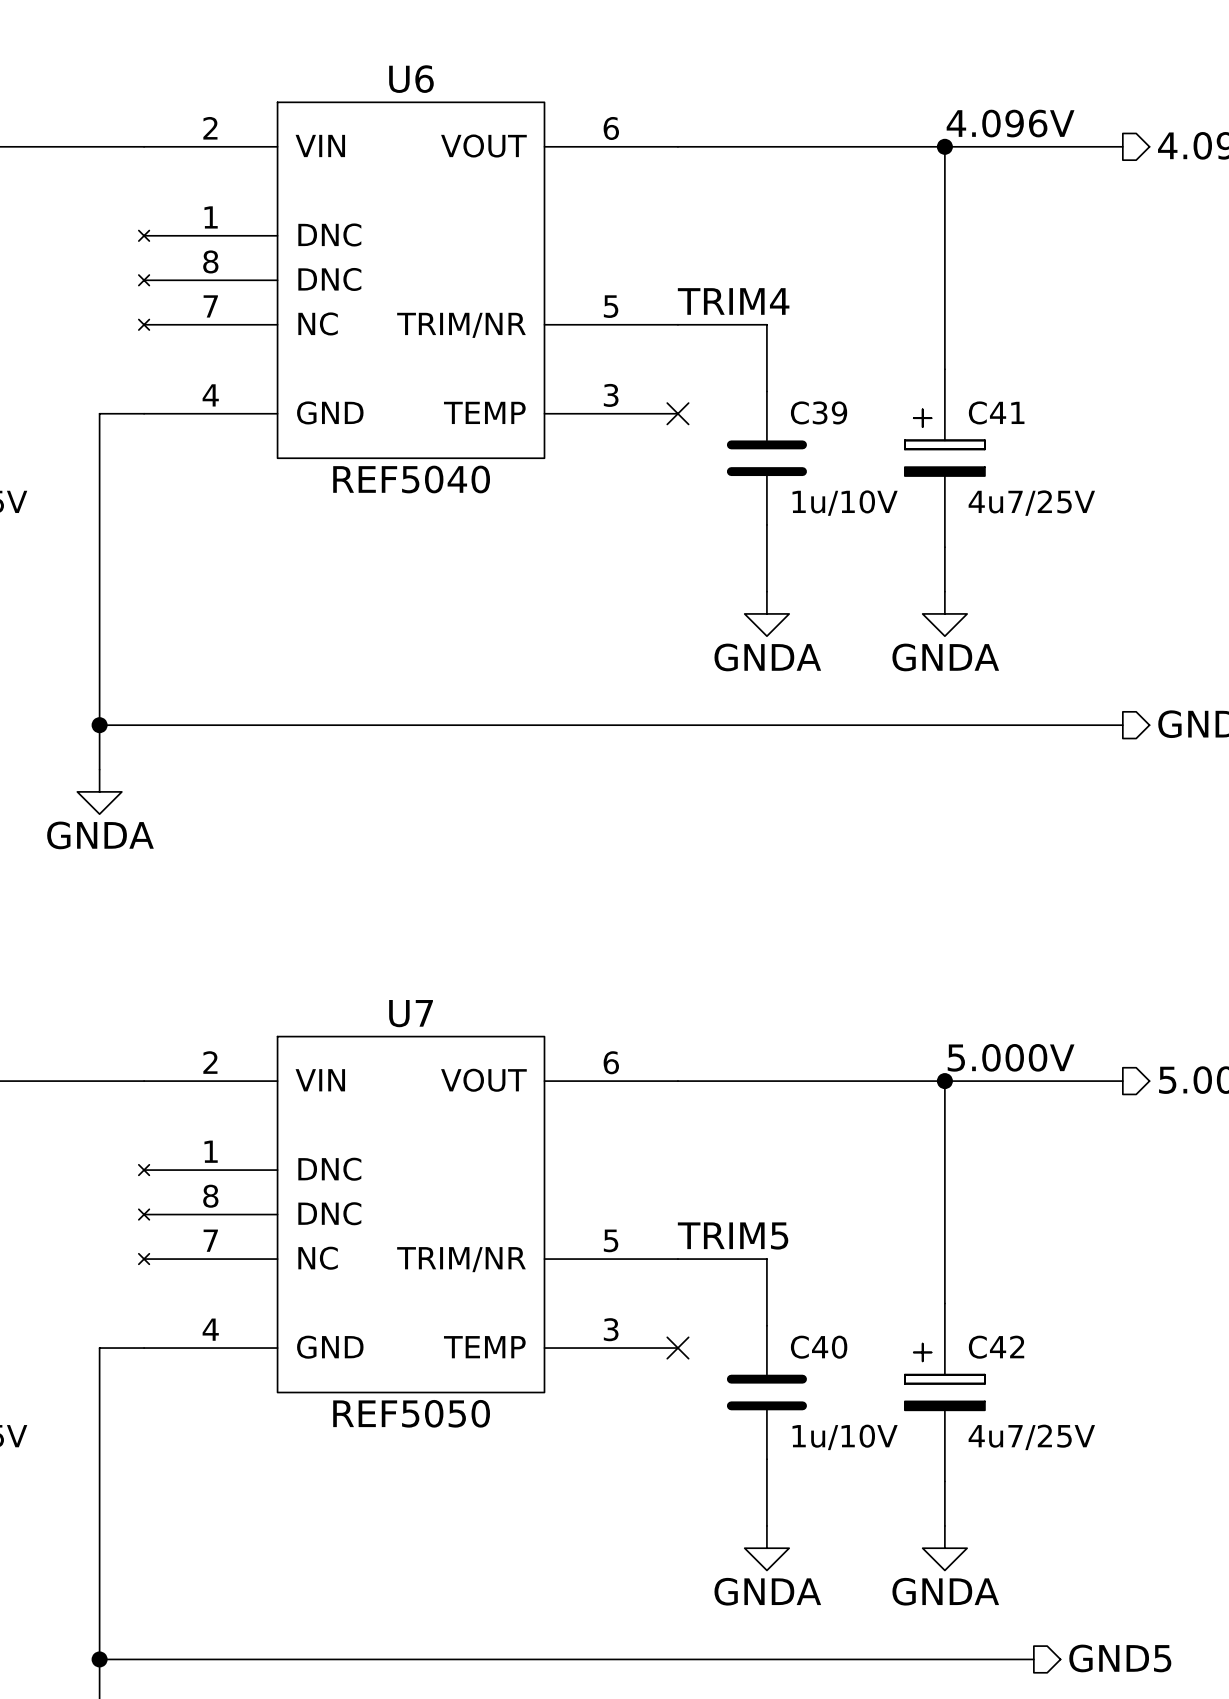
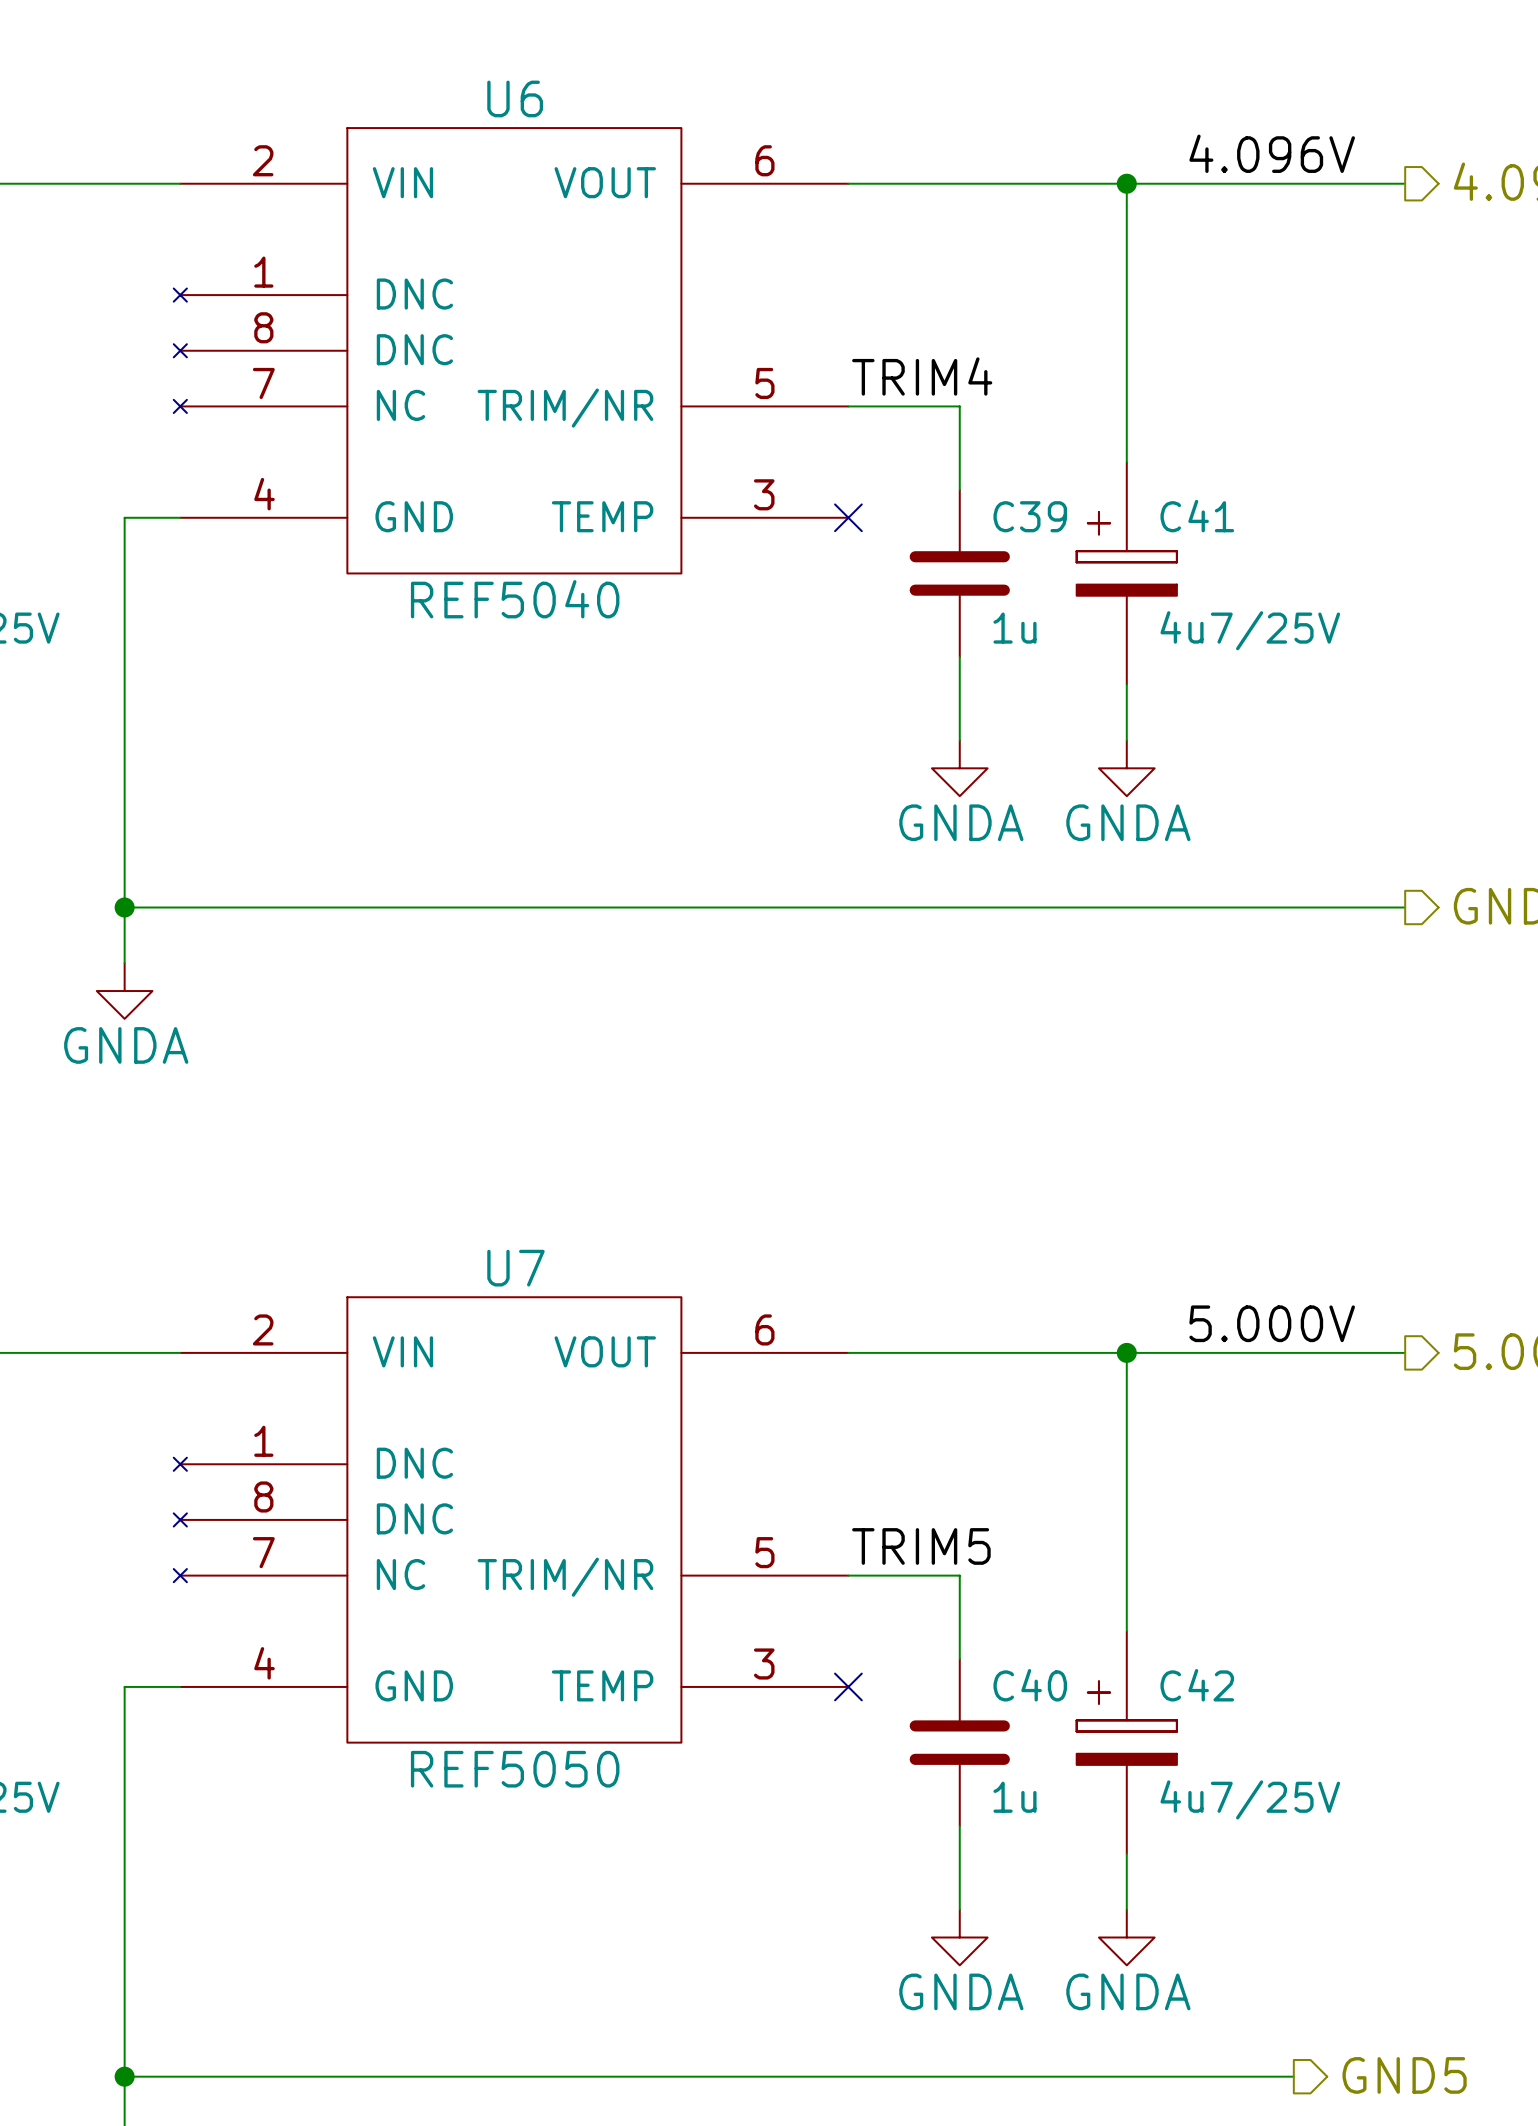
wire: (944, 146) (944, 369) -> (1126, 183) (1126, 462)
junction position: (944, 146) -> (1126, 183)
C41 position: (944, 458) -> (1126, 573)
C39 value: 1u/10V (845, 503) -> 1u (1014, 628)
wire: (944, 547) (944, 591) -> (1126, 684) (1126, 740)
power symbol position: GNDA (944, 613) -> GNDA (1126, 768)
wire: (944, 1081) (944, 1303) -> (1126, 1352) (1126, 1631)
junction position: (944, 1081) -> (1126, 1352)
C42 position: (944, 1392) -> (1126, 1742)
C40 value: 1u/10V (845, 1437) -> 1u (1014, 1797)
wire: (944, 1481) (944, 1525) -> (1126, 1853) (1126, 1909)
power symbol position: GNDA (944, 1548) -> GNDA (1126, 1937)

